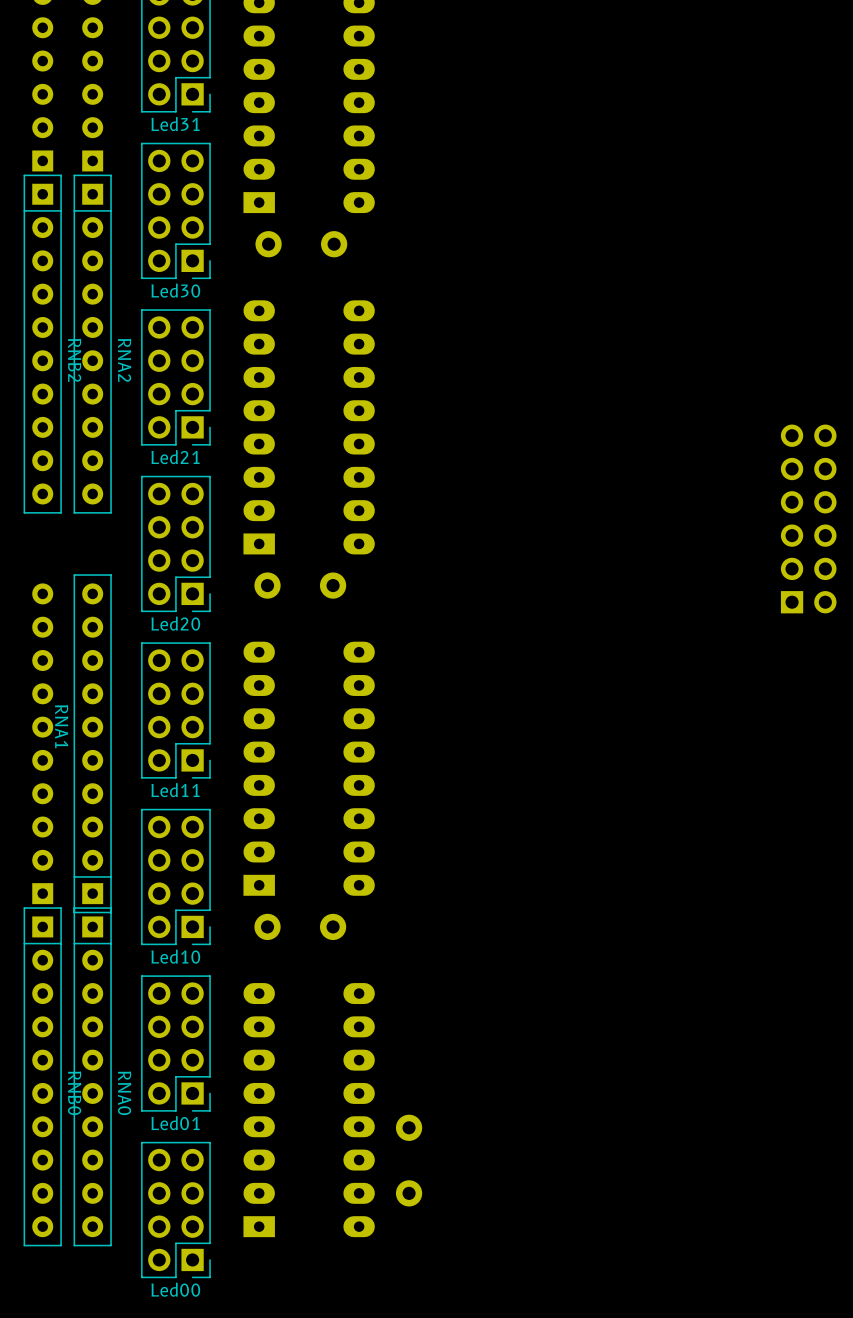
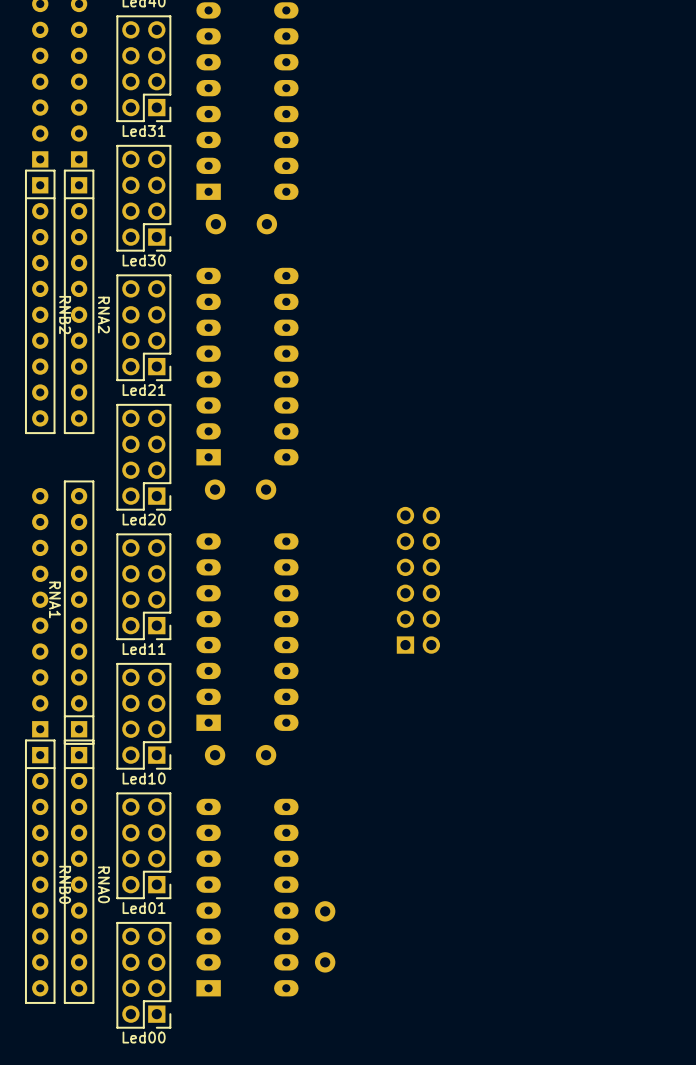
part: (808, 518) -> none
part: none -> (418, 580)

